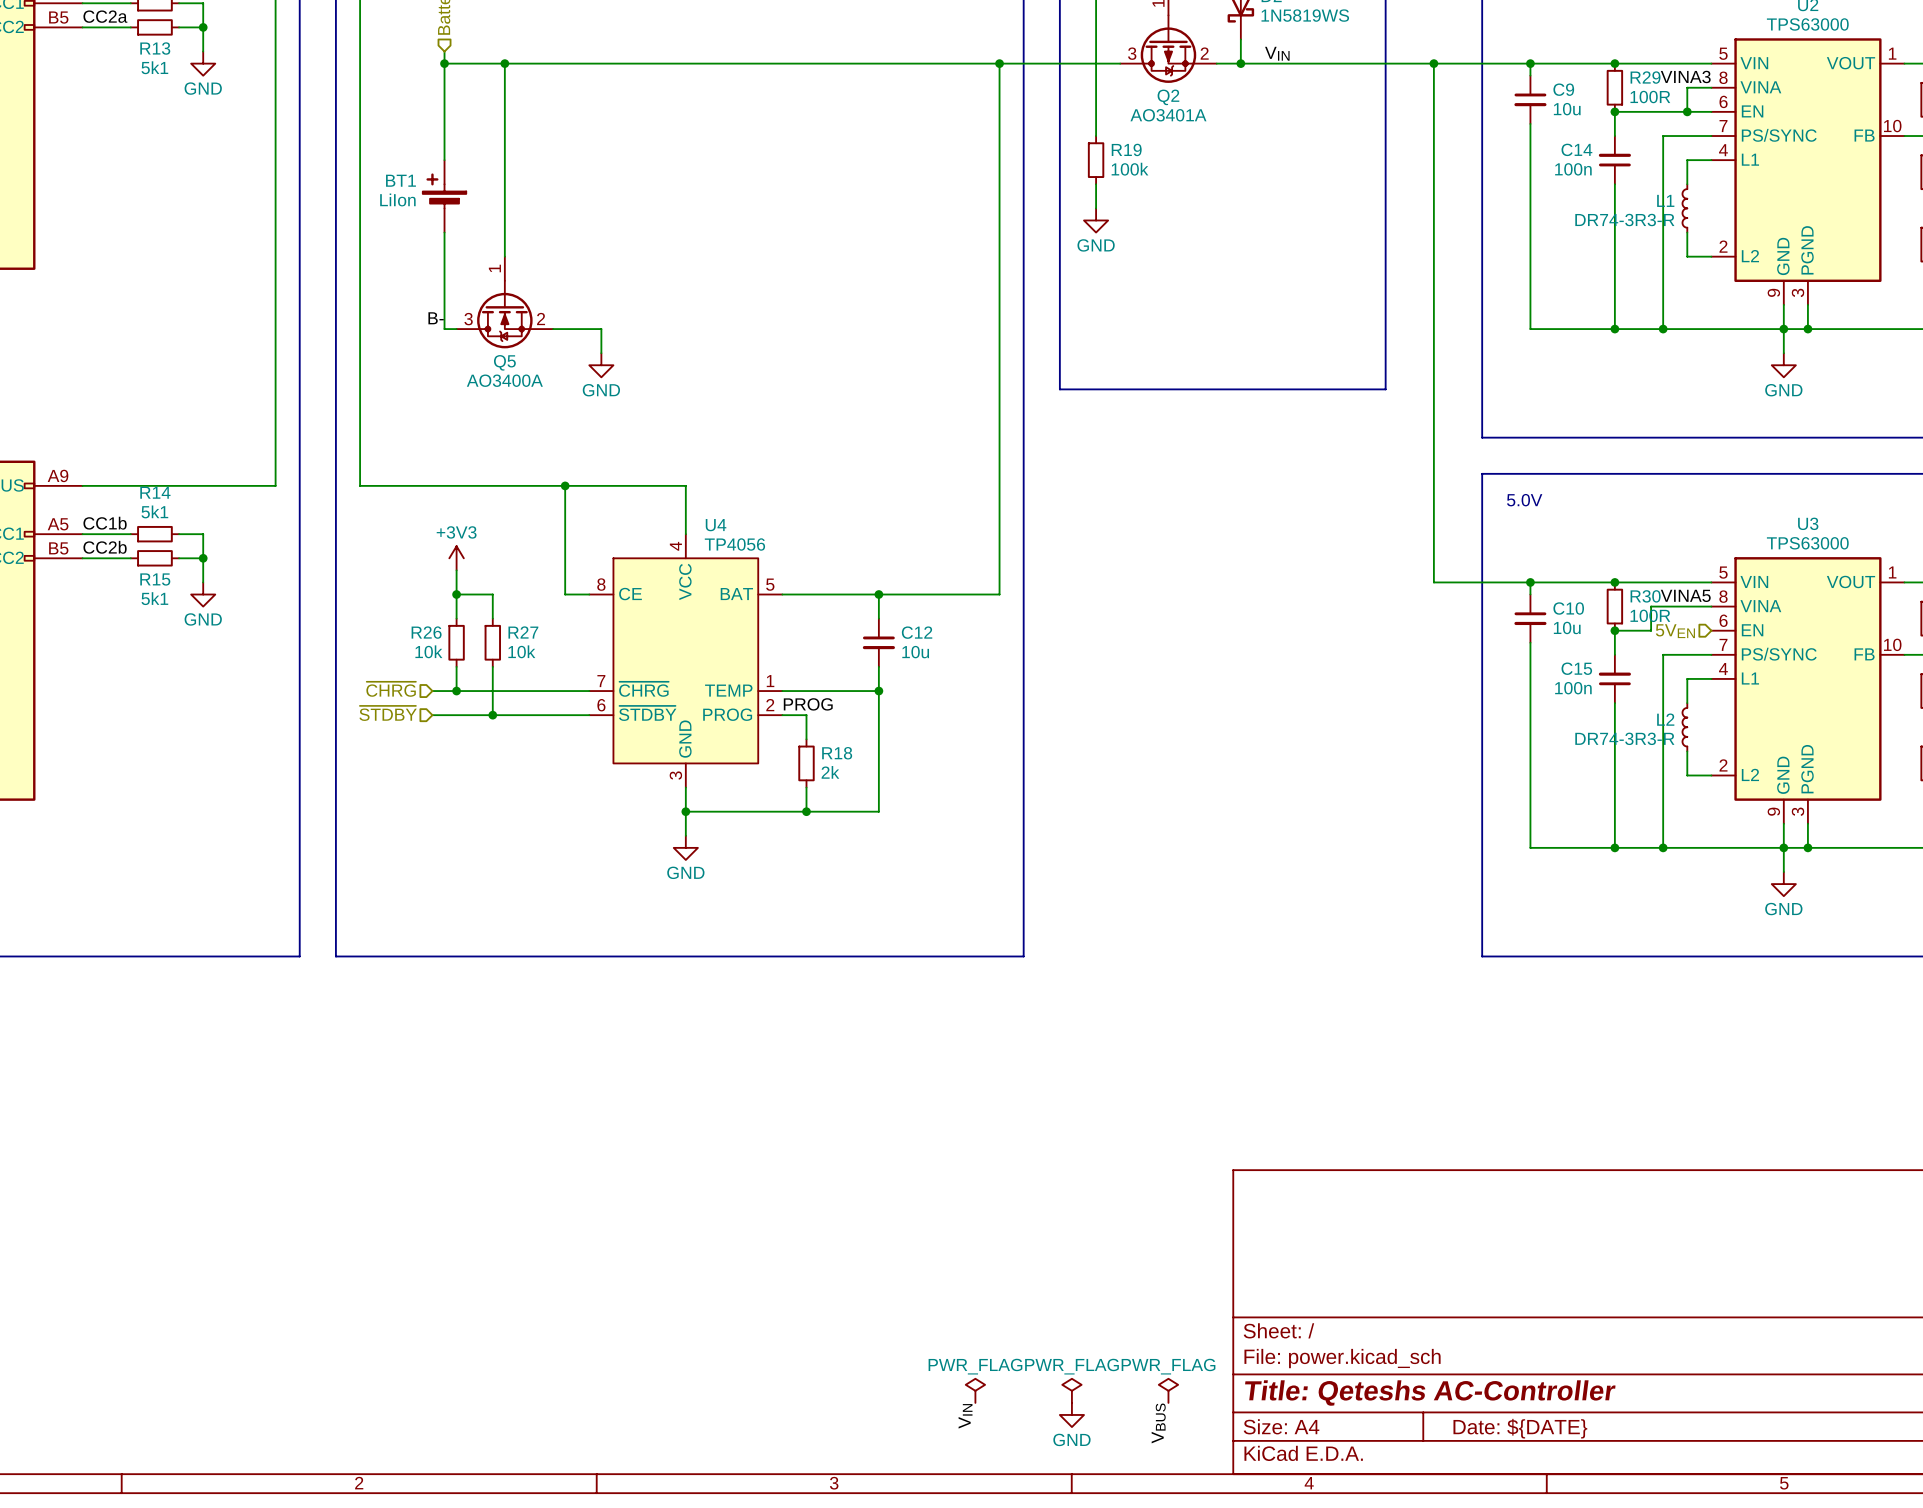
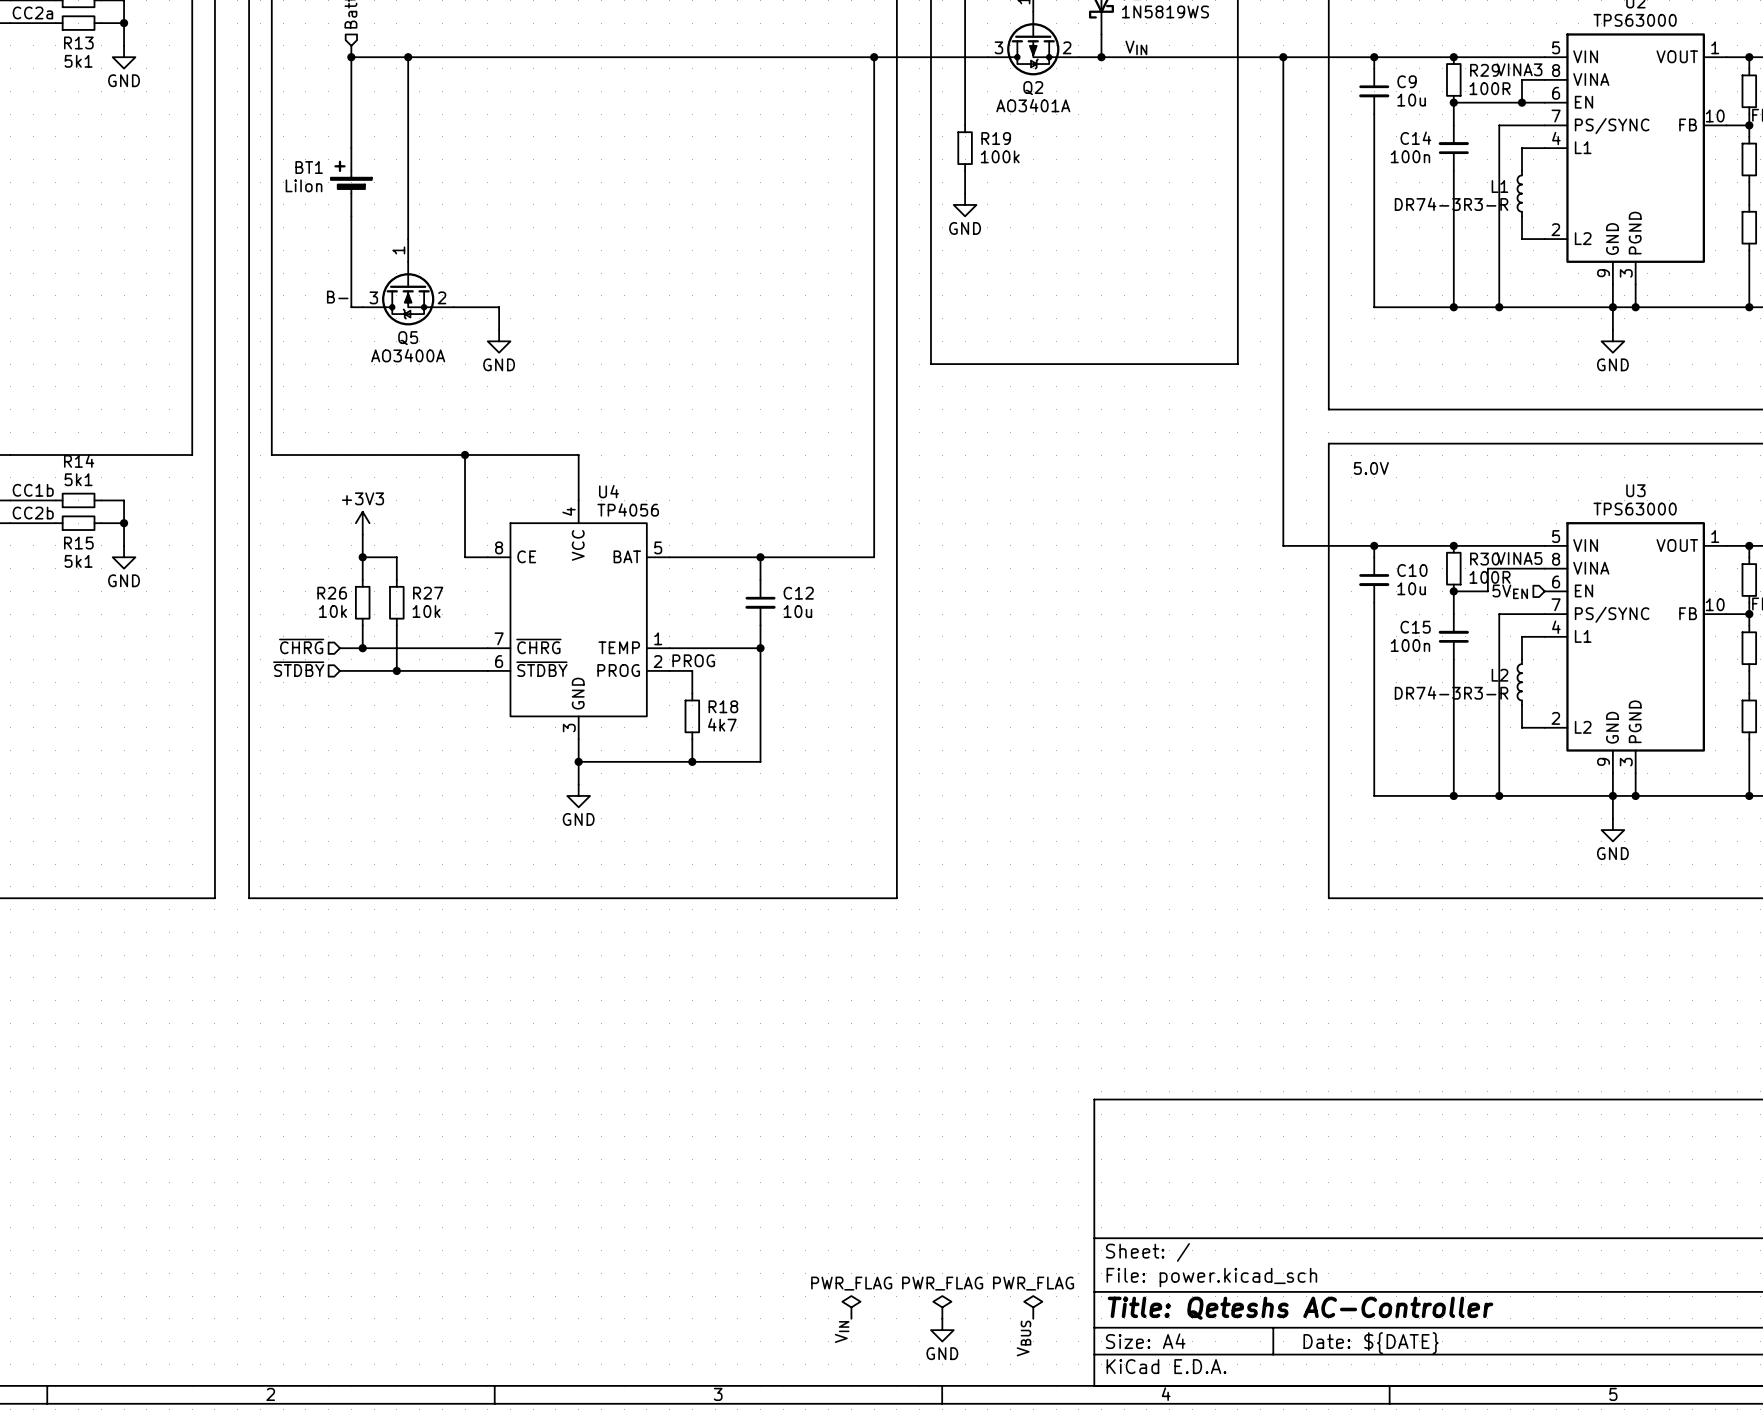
R18 value: 2k (830, 772) -> 4k7 (722, 724)

